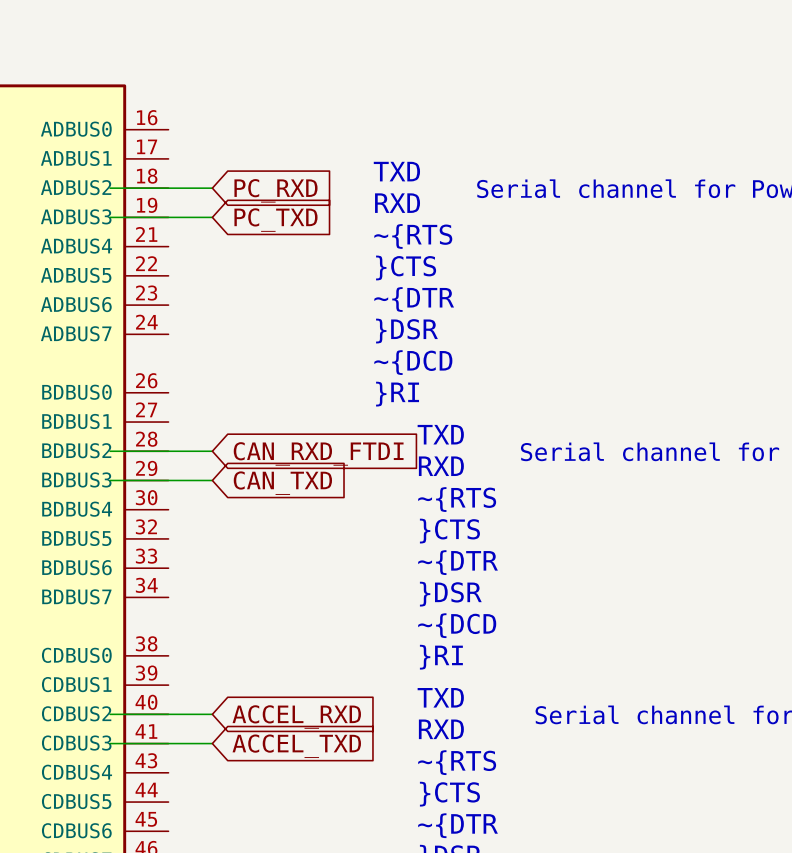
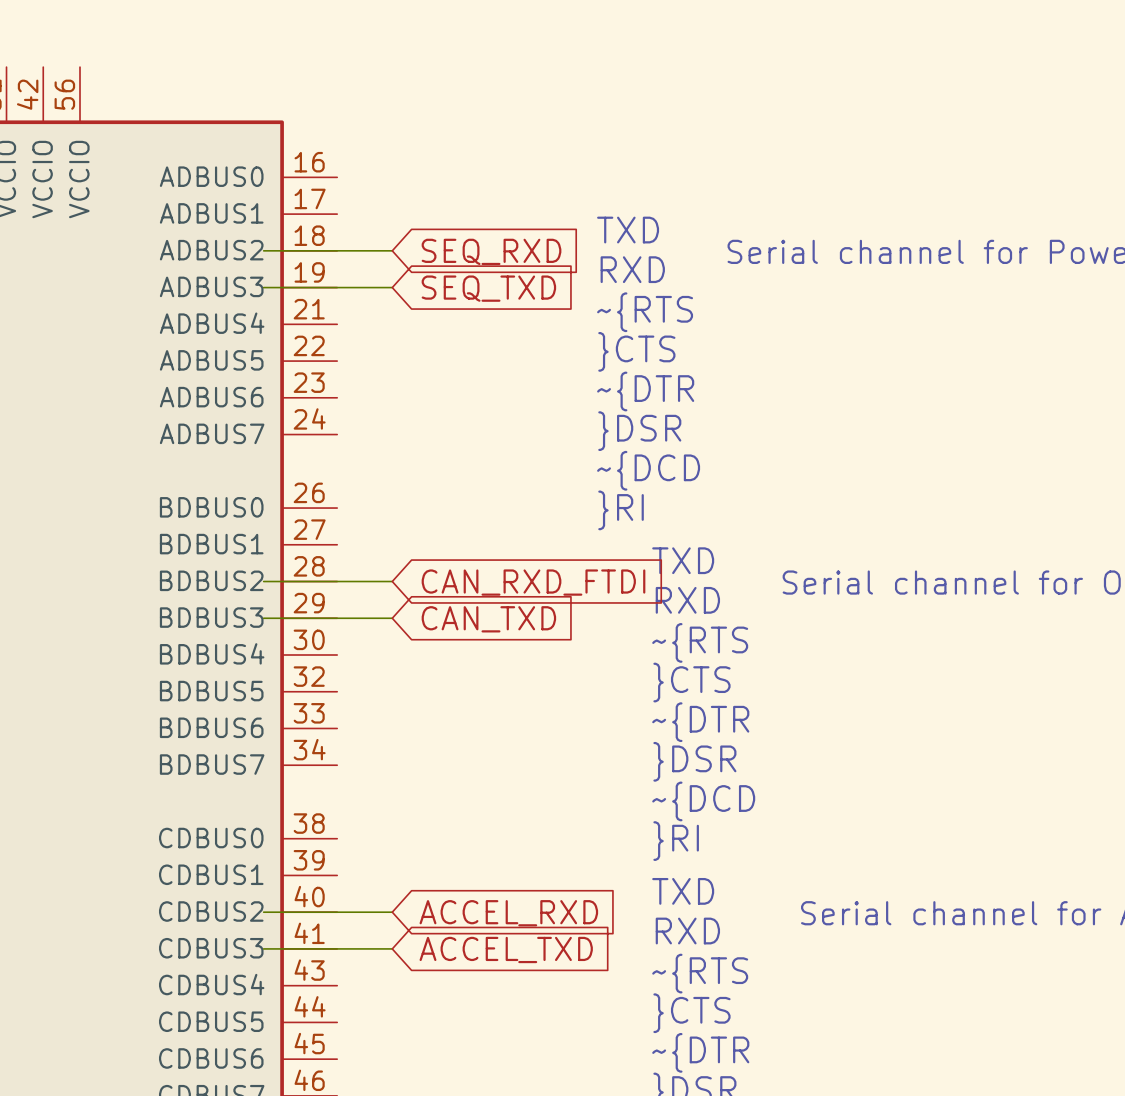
global label: PC_RXD (275, 190) -> SEQ_RXD (491, 251)
global label: PC_TXD (275, 220) -> SEQ_TXD (488, 288)

